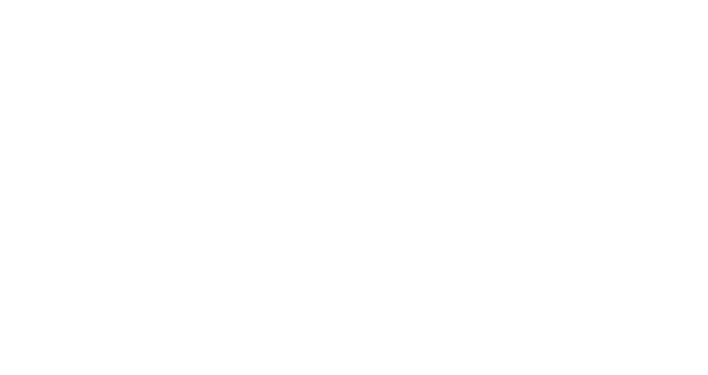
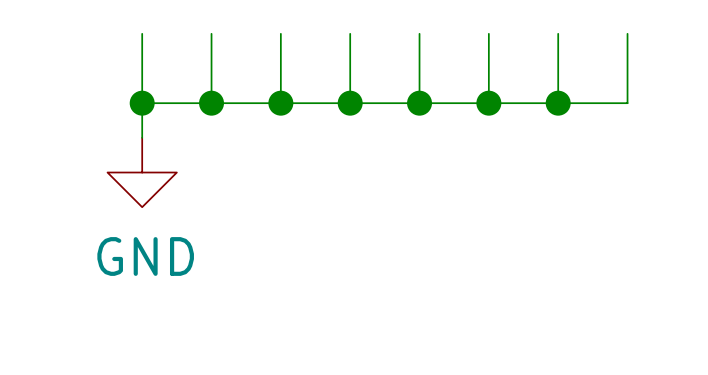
wire: none -> (142, 33) (142, 137)
wire: none -> (211, 33) (211, 103)
wire: none -> (280, 33) (280, 103)
wire: none -> (350, 33) (350, 103)
wire: none -> (419, 33) (419, 103)
wire: none -> (488, 33) (488, 103)
wire: none -> (558, 33) (558, 103)
wire: none -> (627, 33) (627, 103) (142, 103)
junction: none -> (142, 103)
junction: none -> (211, 103)
junction: none -> (280, 103)
junction: none -> (350, 103)
junction: none -> (419, 103)
junction: none -> (488, 103)
junction: none -> (558, 103)
power symbol: none -> GND (142, 172)

